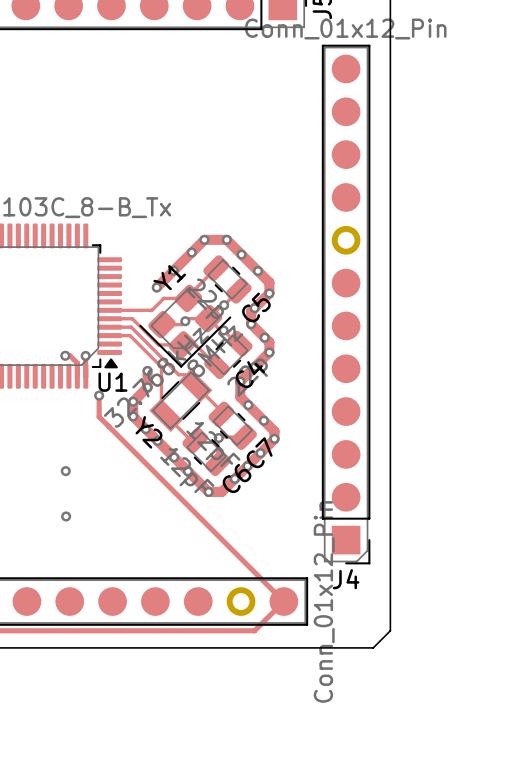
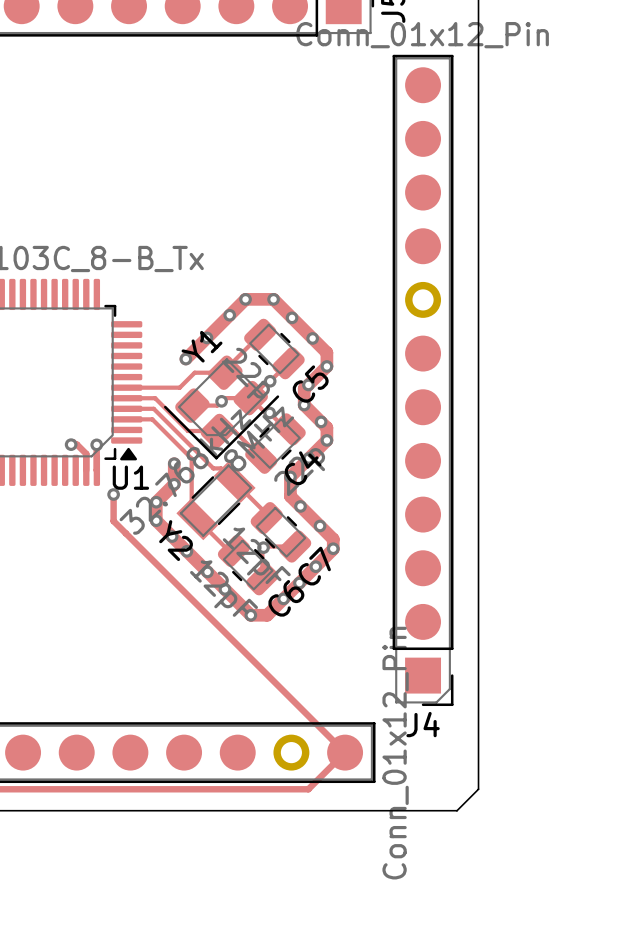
via: (65, 471) -> none
via: (66, 516) -> none

